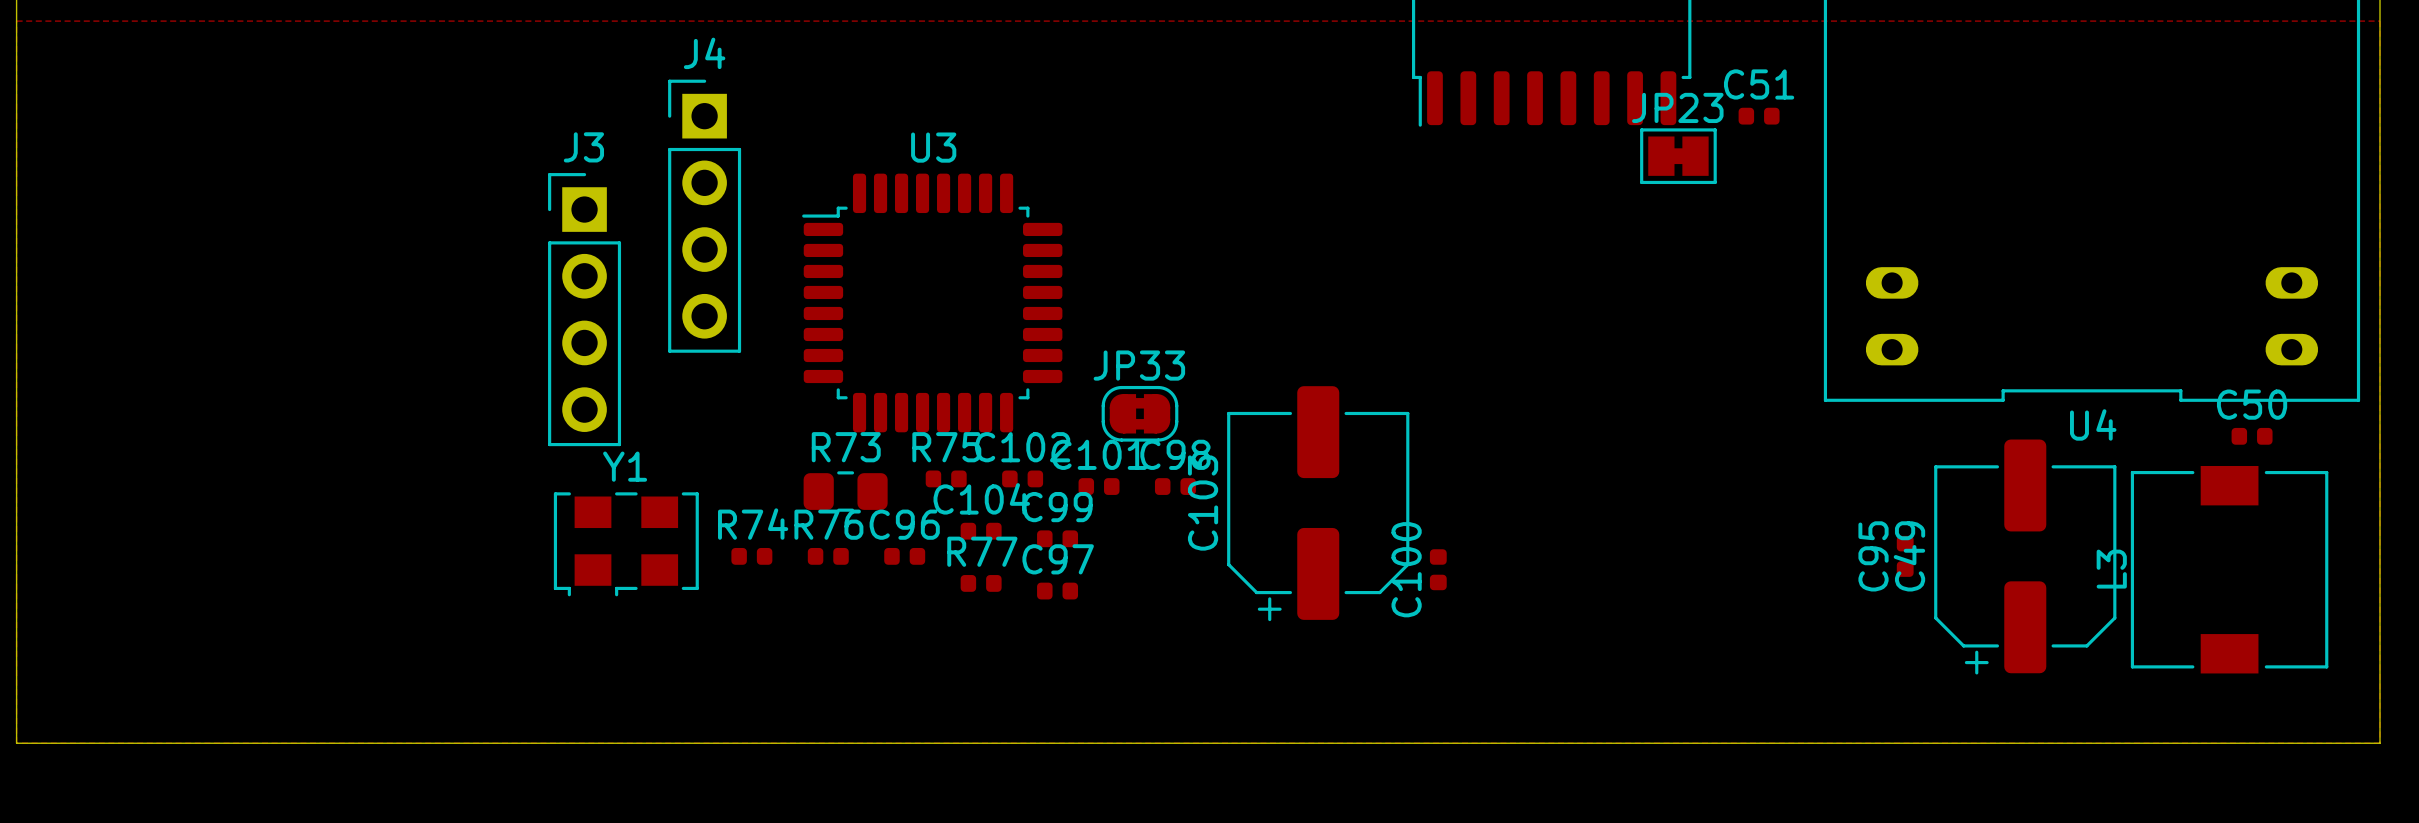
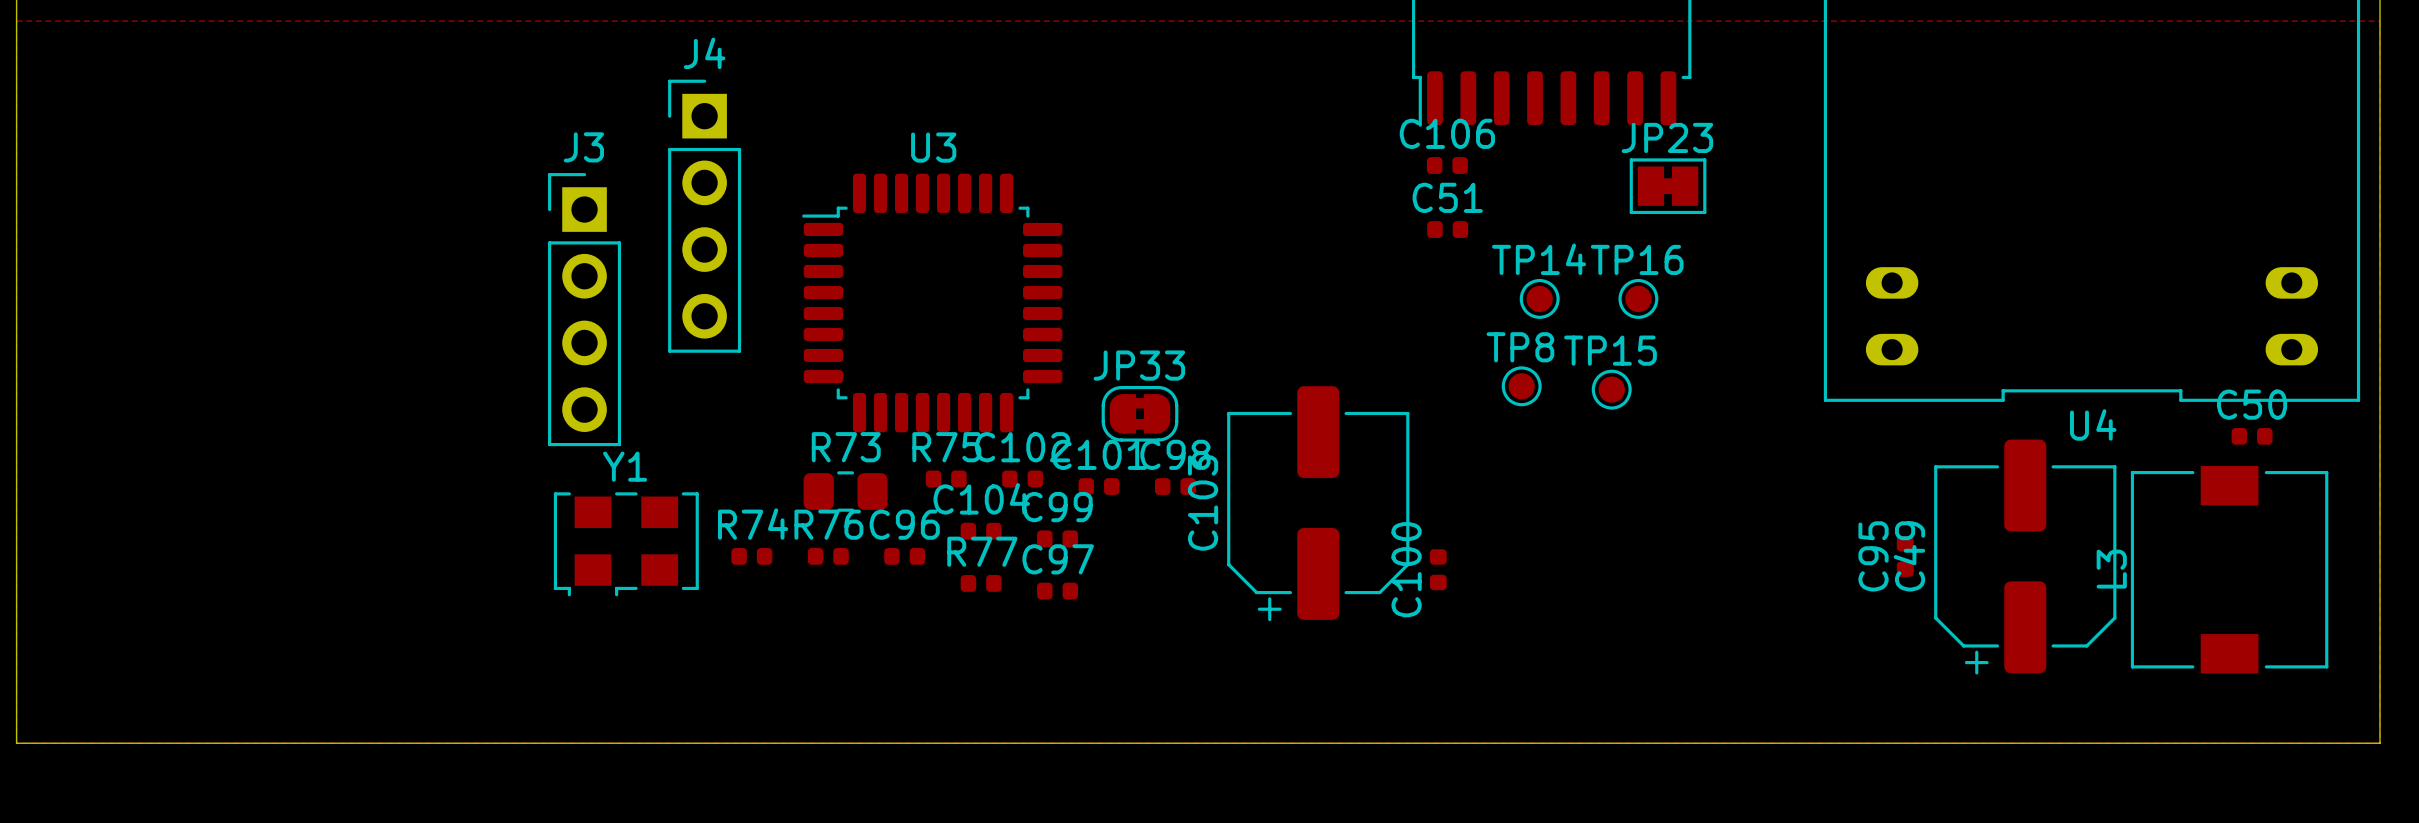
C51 position: (1759, 116) -> (1447, 229)
JP23 position: (1678, 156) -> (1668, 186)
C106: none -> (1447, 165)
TP14: none -> (1539, 298)
TP16: none -> (1638, 298)
TP8: none -> (1521, 386)
TP15: none -> (1611, 389)

